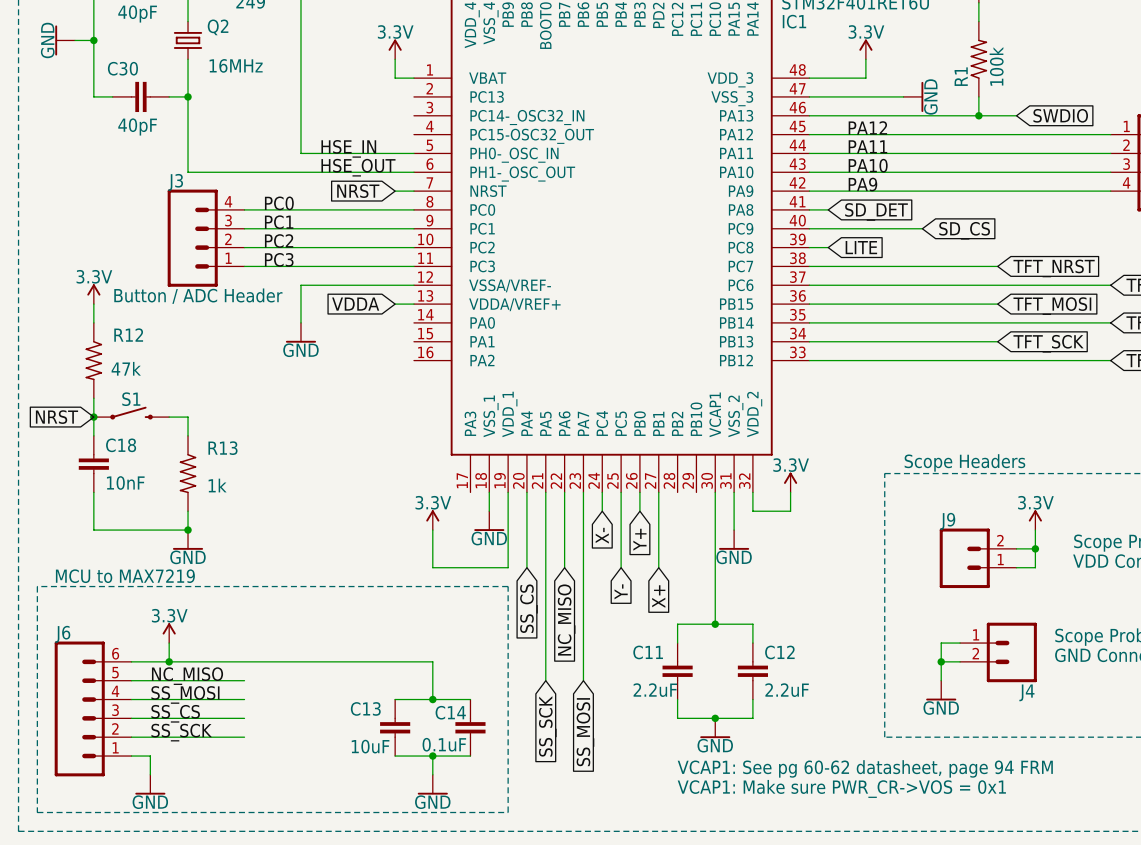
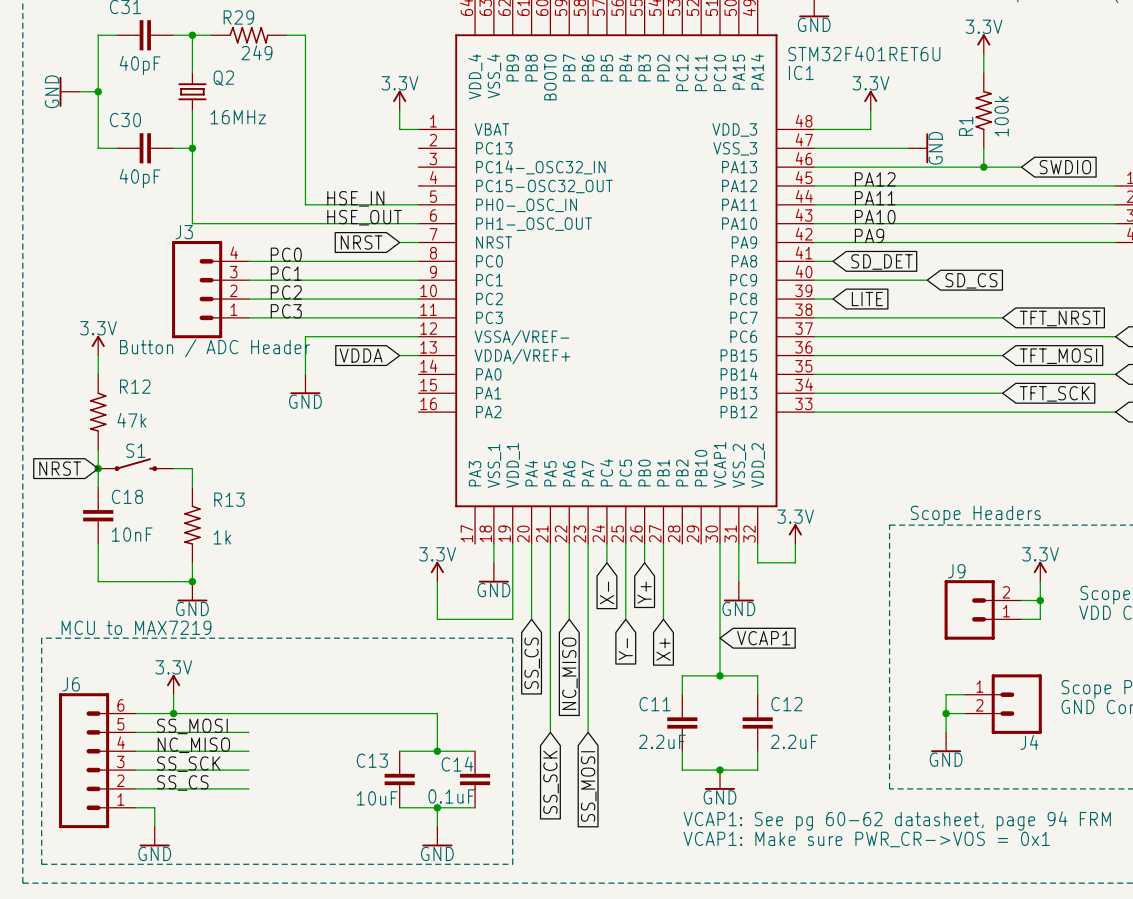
global label: none -> VCAP1 (763, 638)
label: NC_MISO (187, 676) -> SS_MOSI (192, 726)
label: SS_MOSI (185, 694) -> NC_MISO (193, 745)
label: SS_CS (175, 713) -> SS_SCK (188, 764)
label: SS_SCK (181, 732) -> SS_CS (182, 782)

